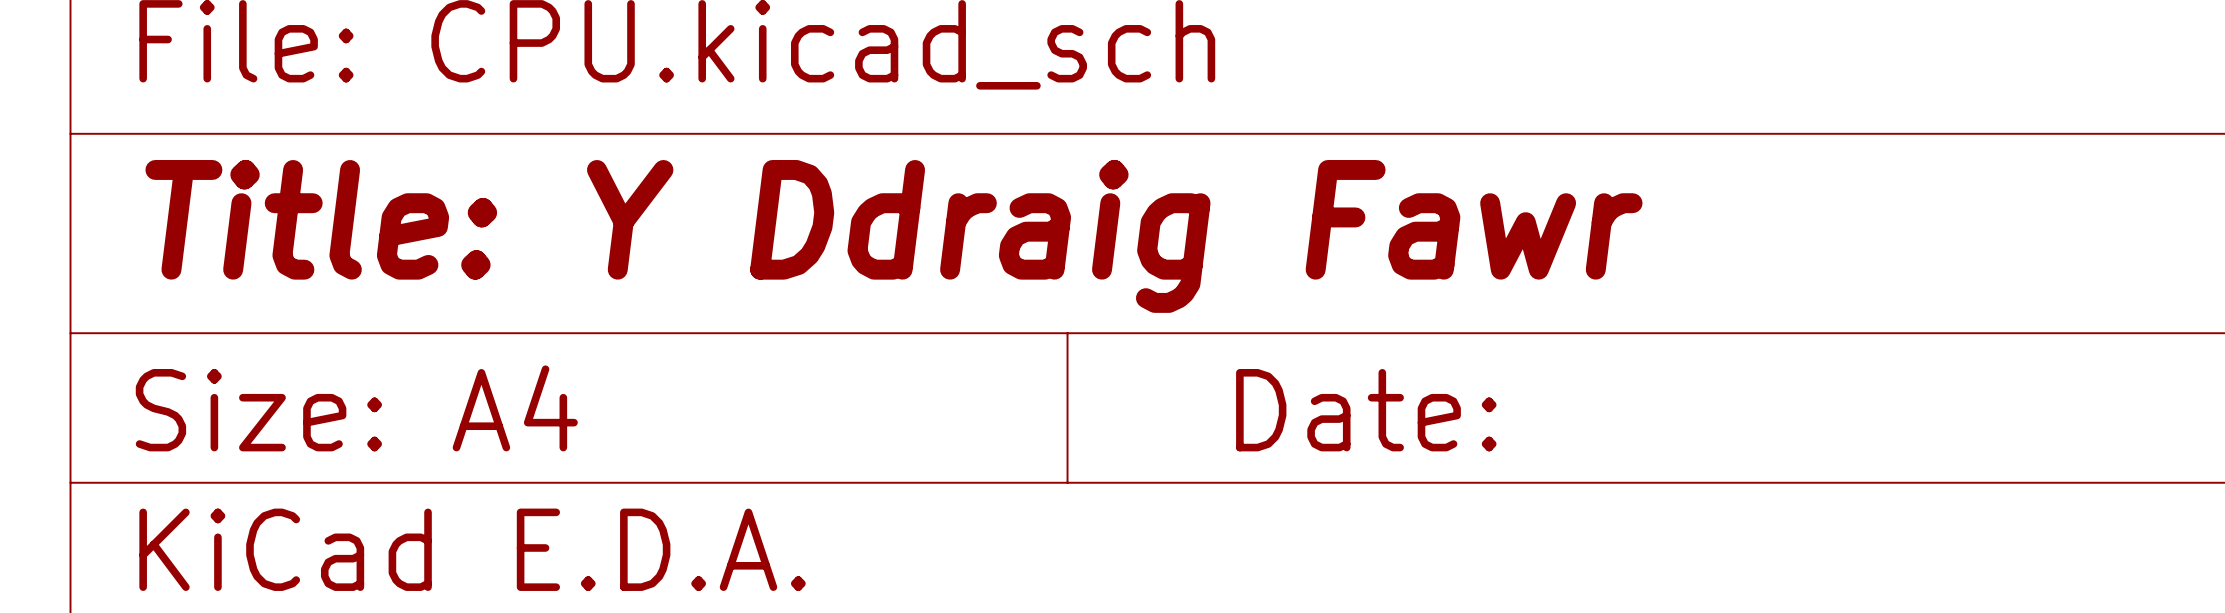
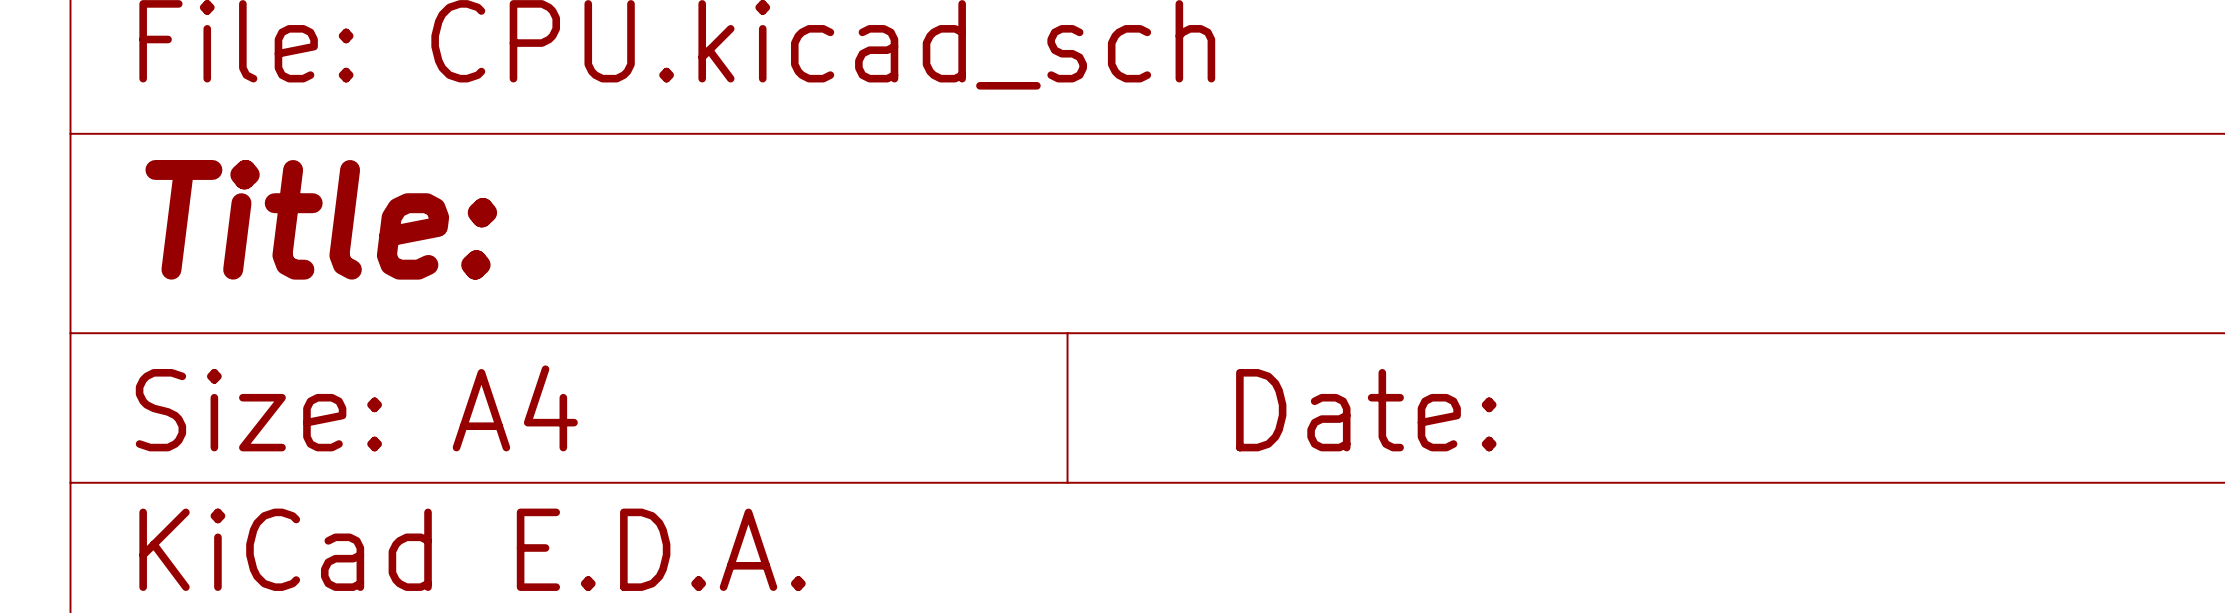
title block: Title: Y Ddraig Fawr (894, 236) -> Title: (321, 219)

